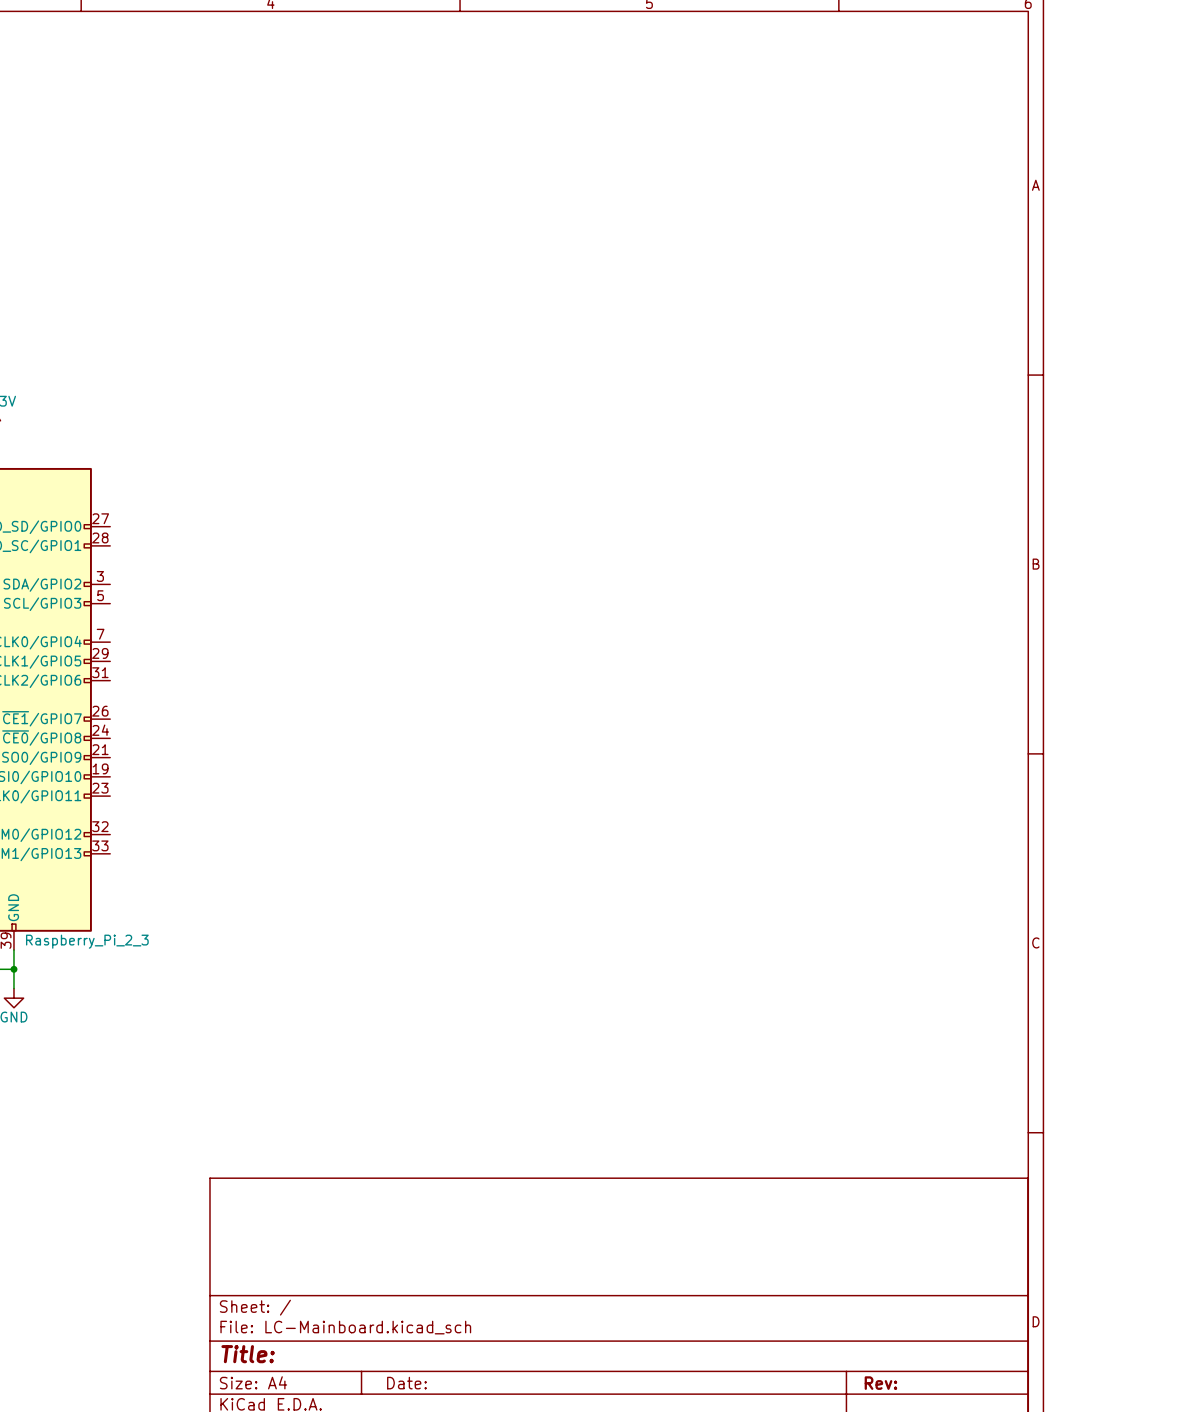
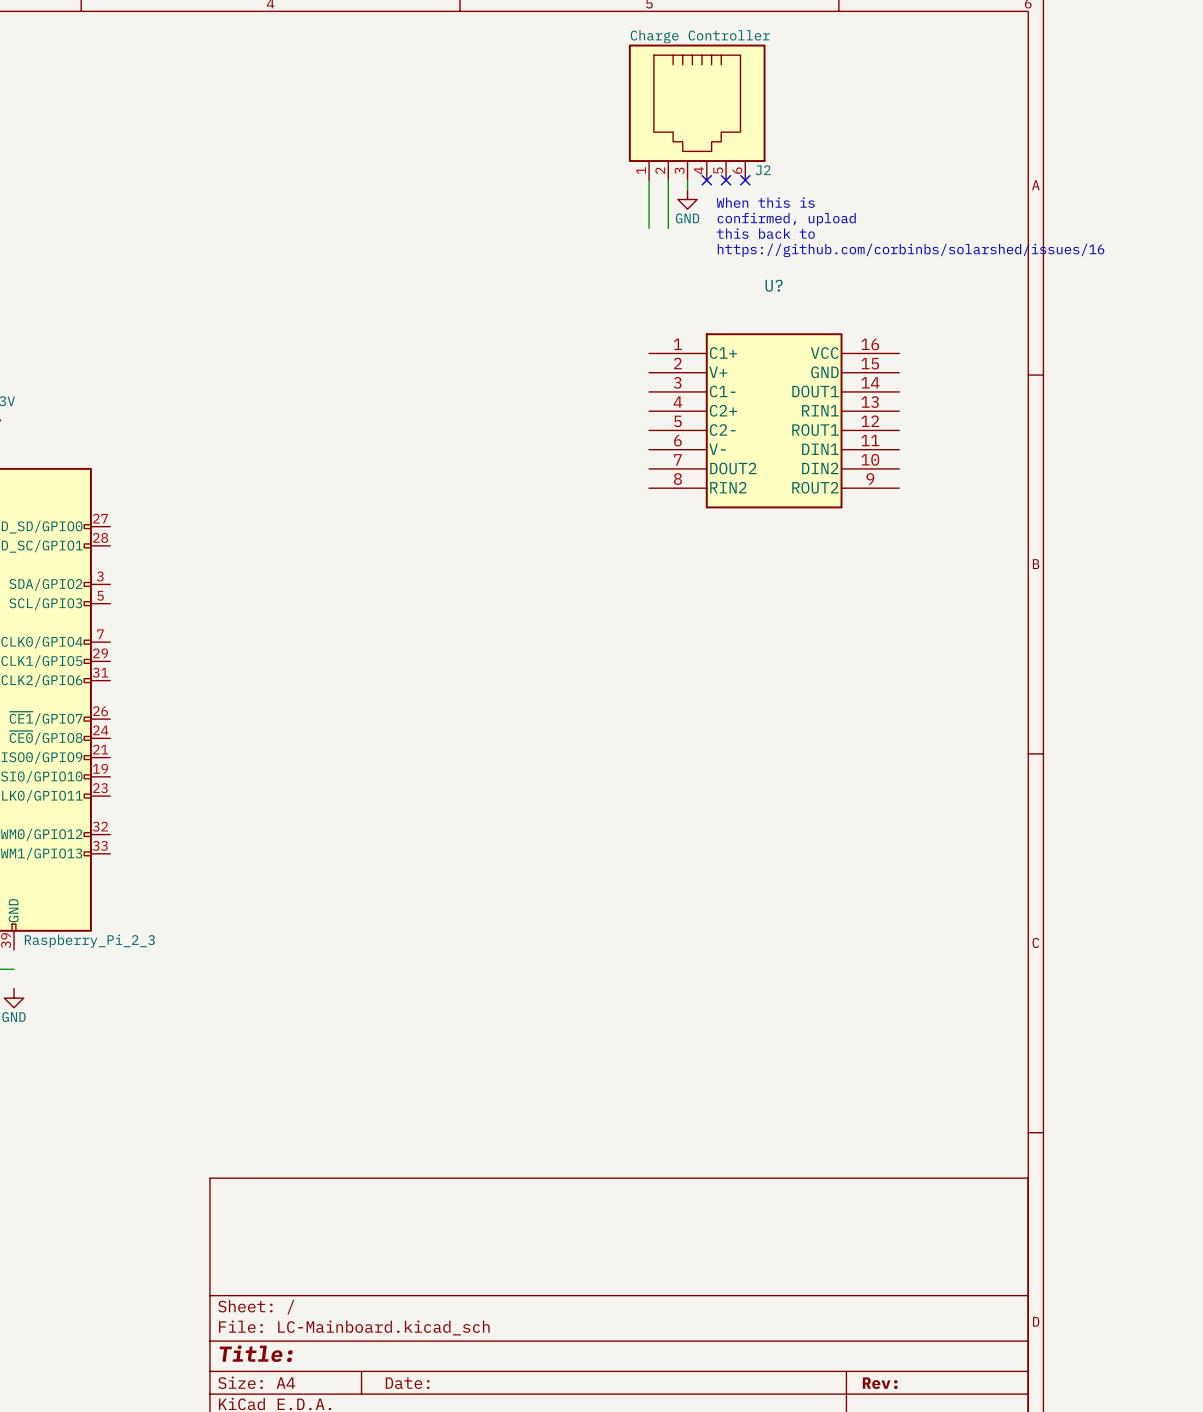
J2: none -> Charge Controller (697, 112)
wire: none -> (649, 180) (649, 228)
wire: none -> (668, 180) (668, 228)
wire: none -> (687, 180) (687, 189)
no-connect mark: none -> (706, 180)
no-connect mark: none -> (726, 180)
no-connect mark: none -> (745, 180)
power symbol: none -> GND (687, 199)
text: none -> When this is (765, 202)
text: none -> confirmed, upload (786, 219)
text: none -> this back to (765, 233)
text: none -> https://github.com/corbinbs/solarshed/issues/16 (911, 250)
U?: none -> (774, 420)
wire: (13, 950) (13, 988) -> none
junction: (13, 969) -> none

